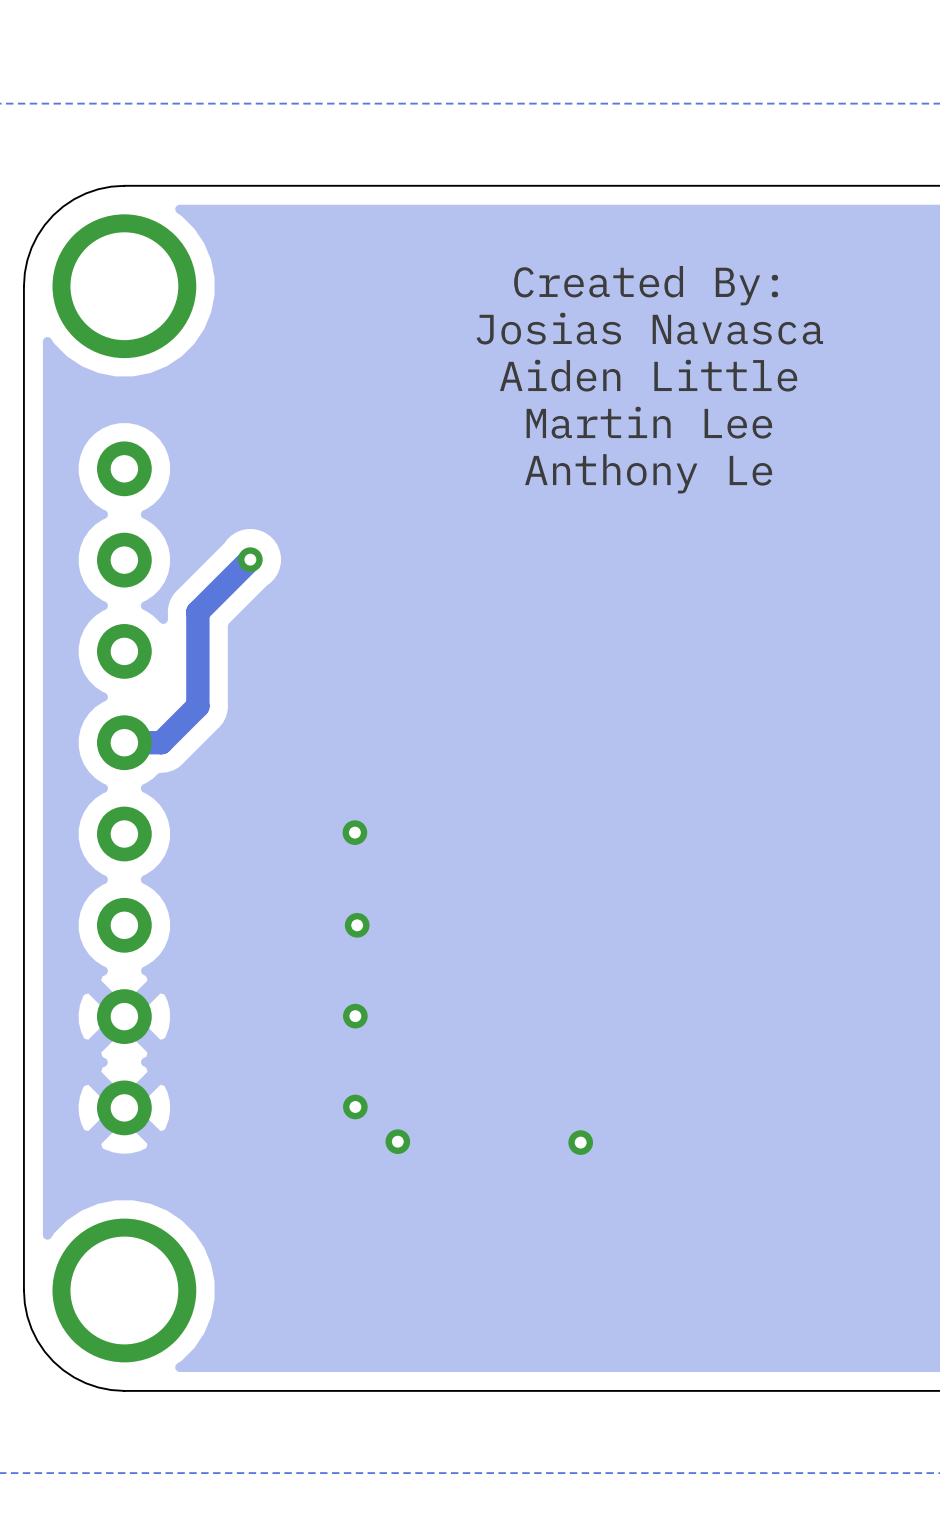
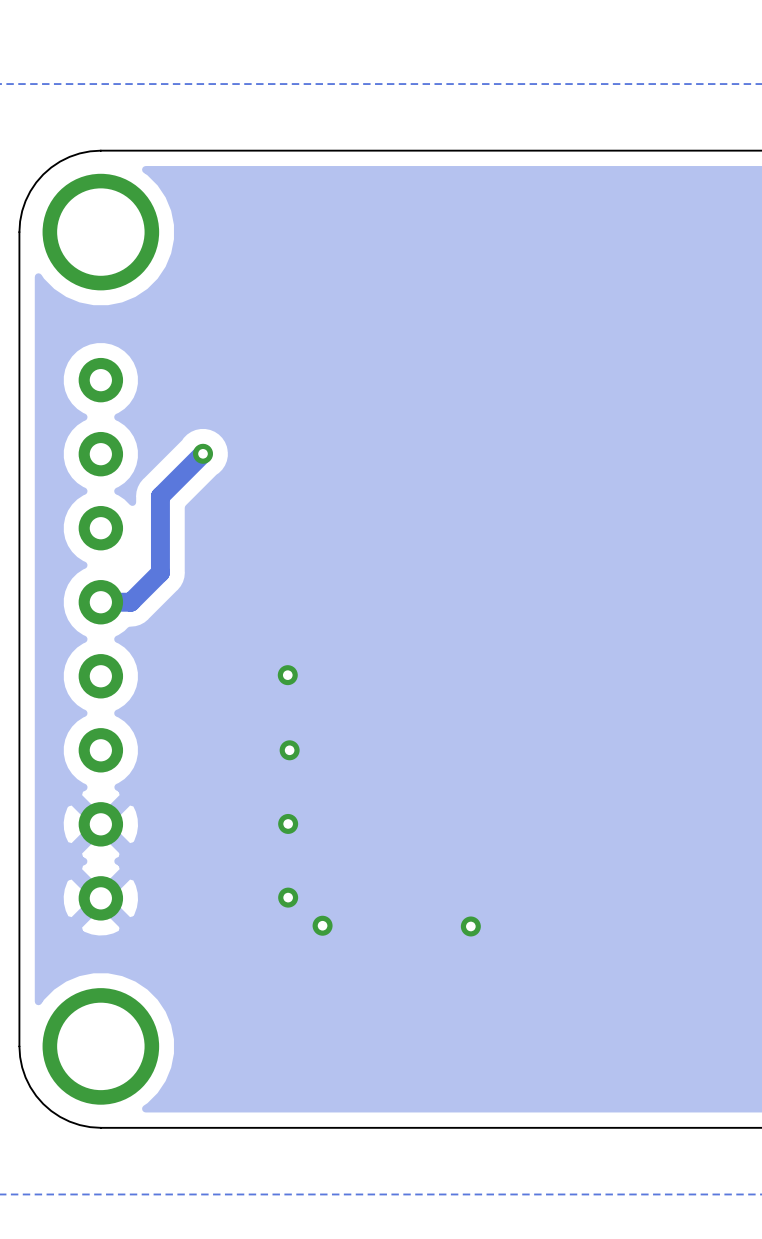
text: Created By: (646, 285) -> none
text: Josias Navasca (649, 328) -> none
text: Aiden Little (648, 375) -> none
text: Martin Lee (649, 422) -> none
text: Anthony Le (648, 473) -> none

